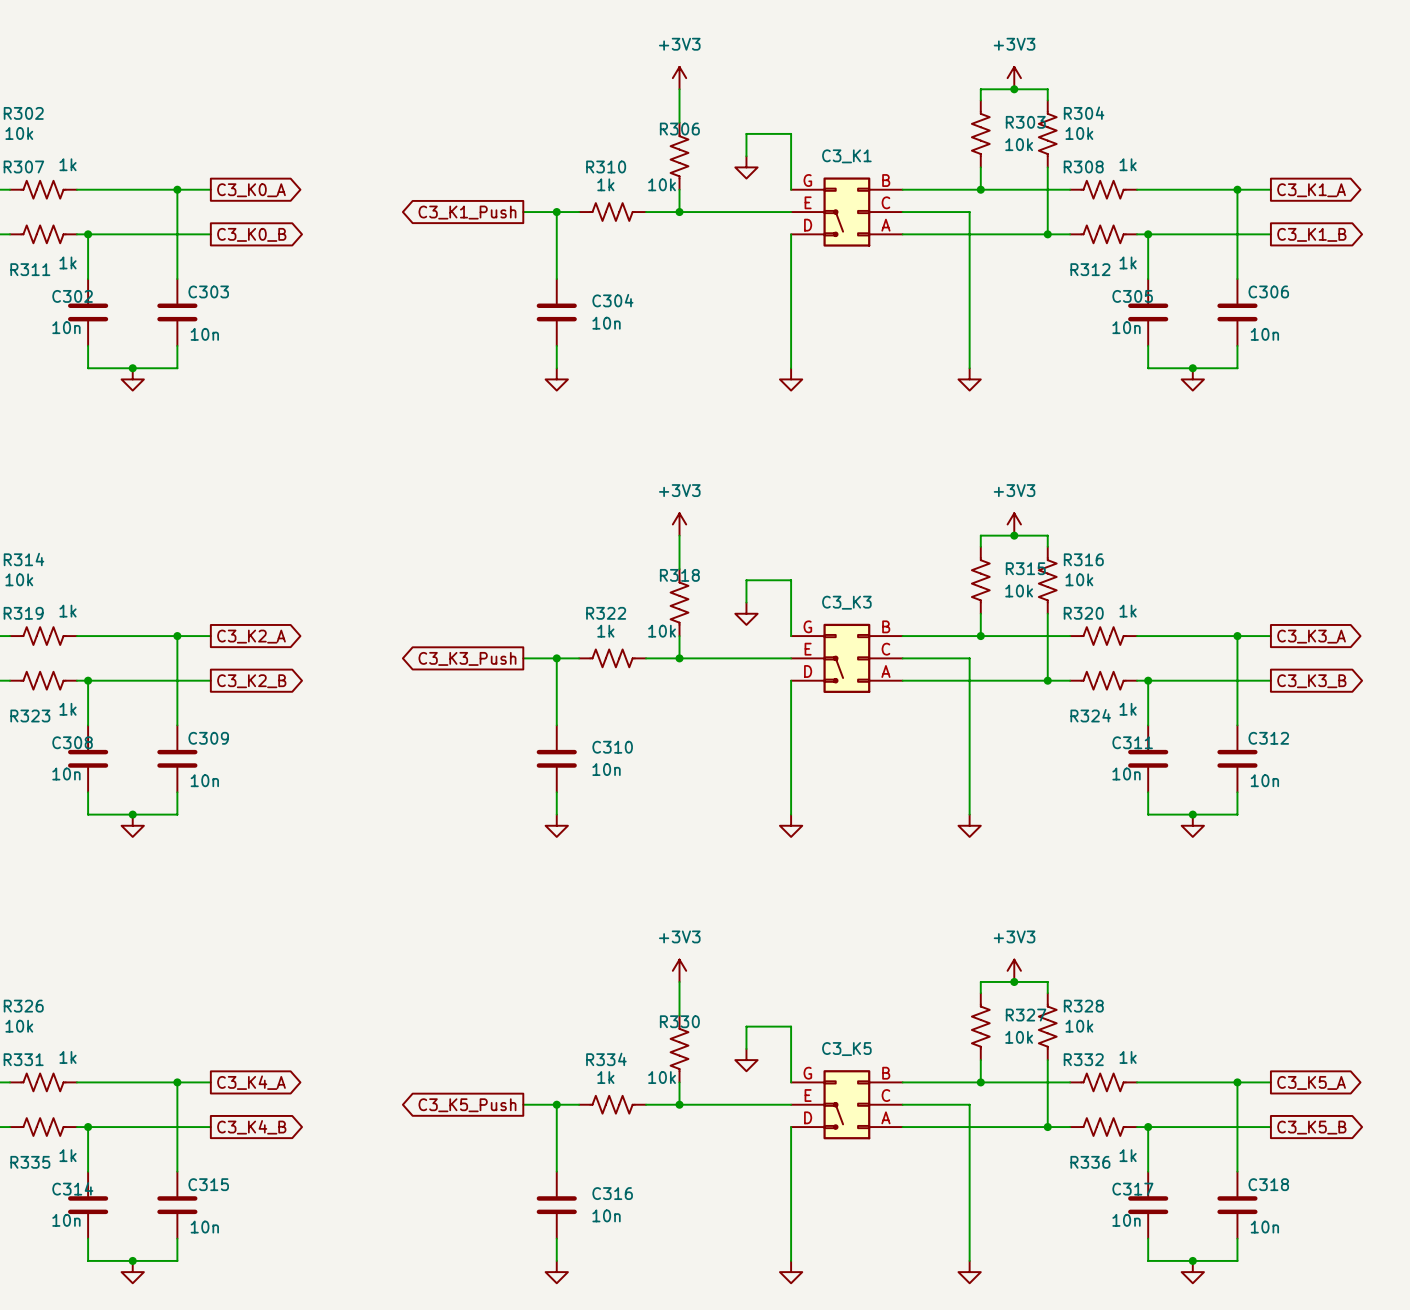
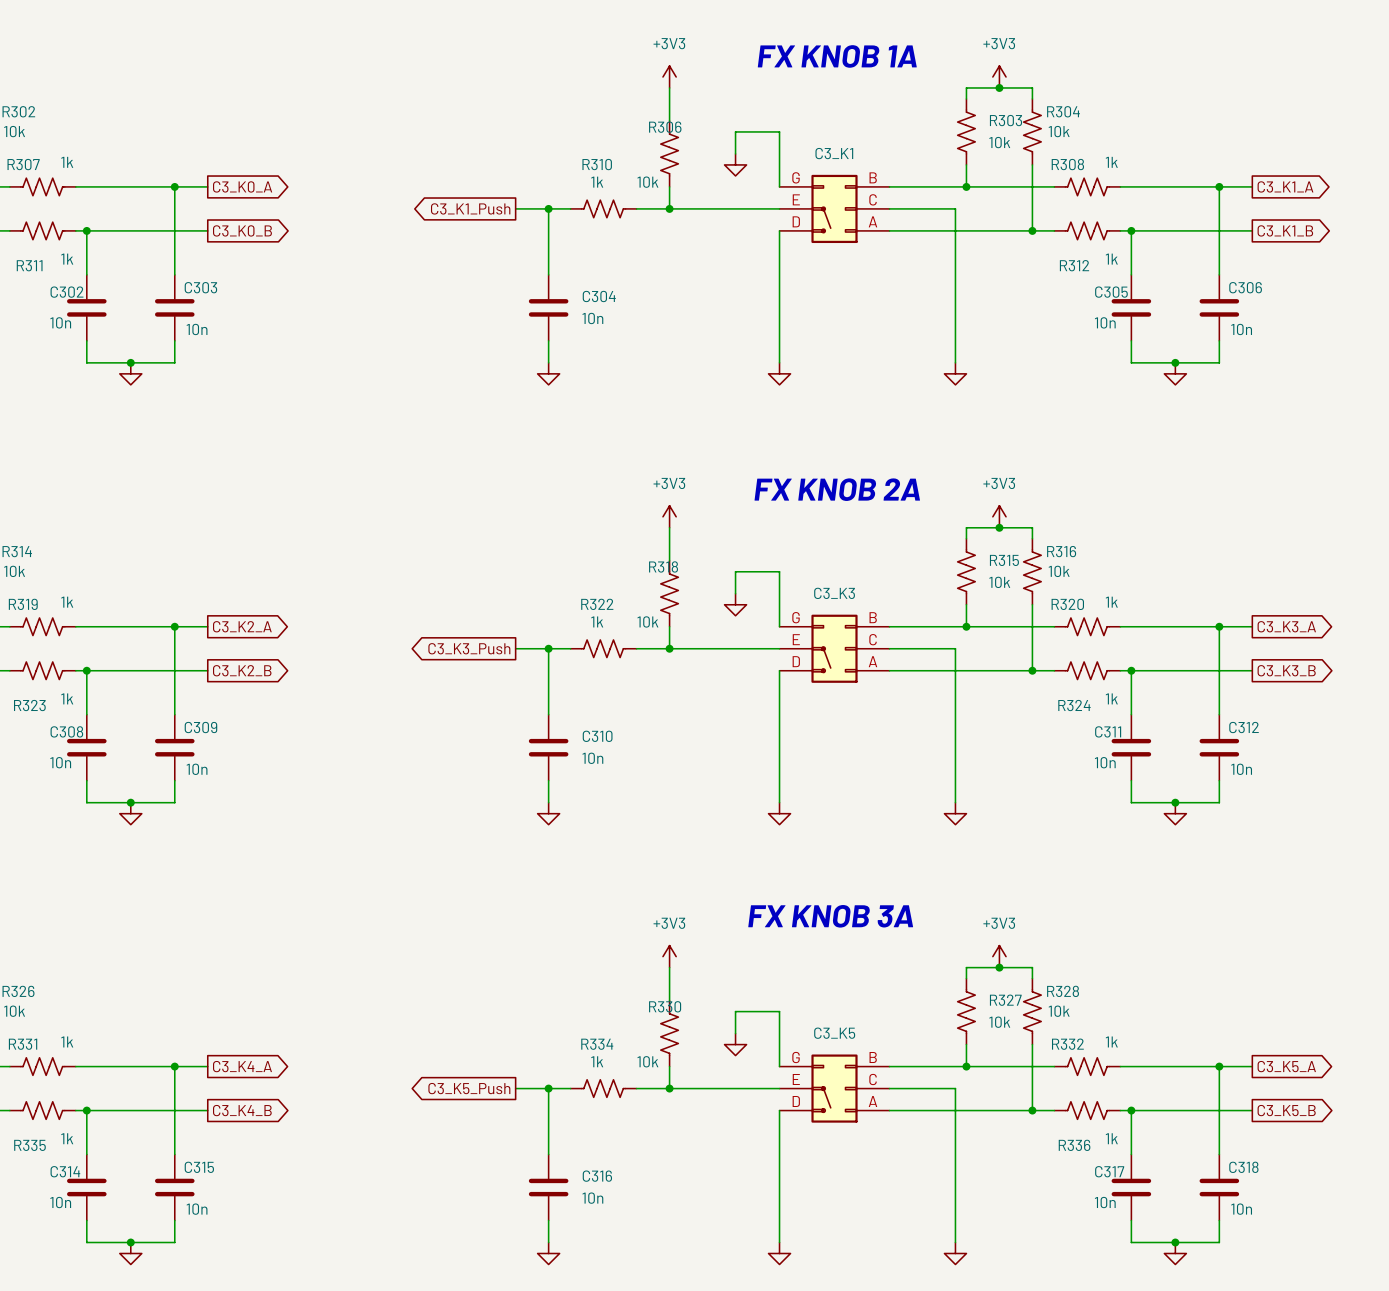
text: none -> FX KNOB 1A (837, 56)
text: none -> FX KNOB 2A (837, 489)
text: none -> FX KNOB 3A (830, 916)

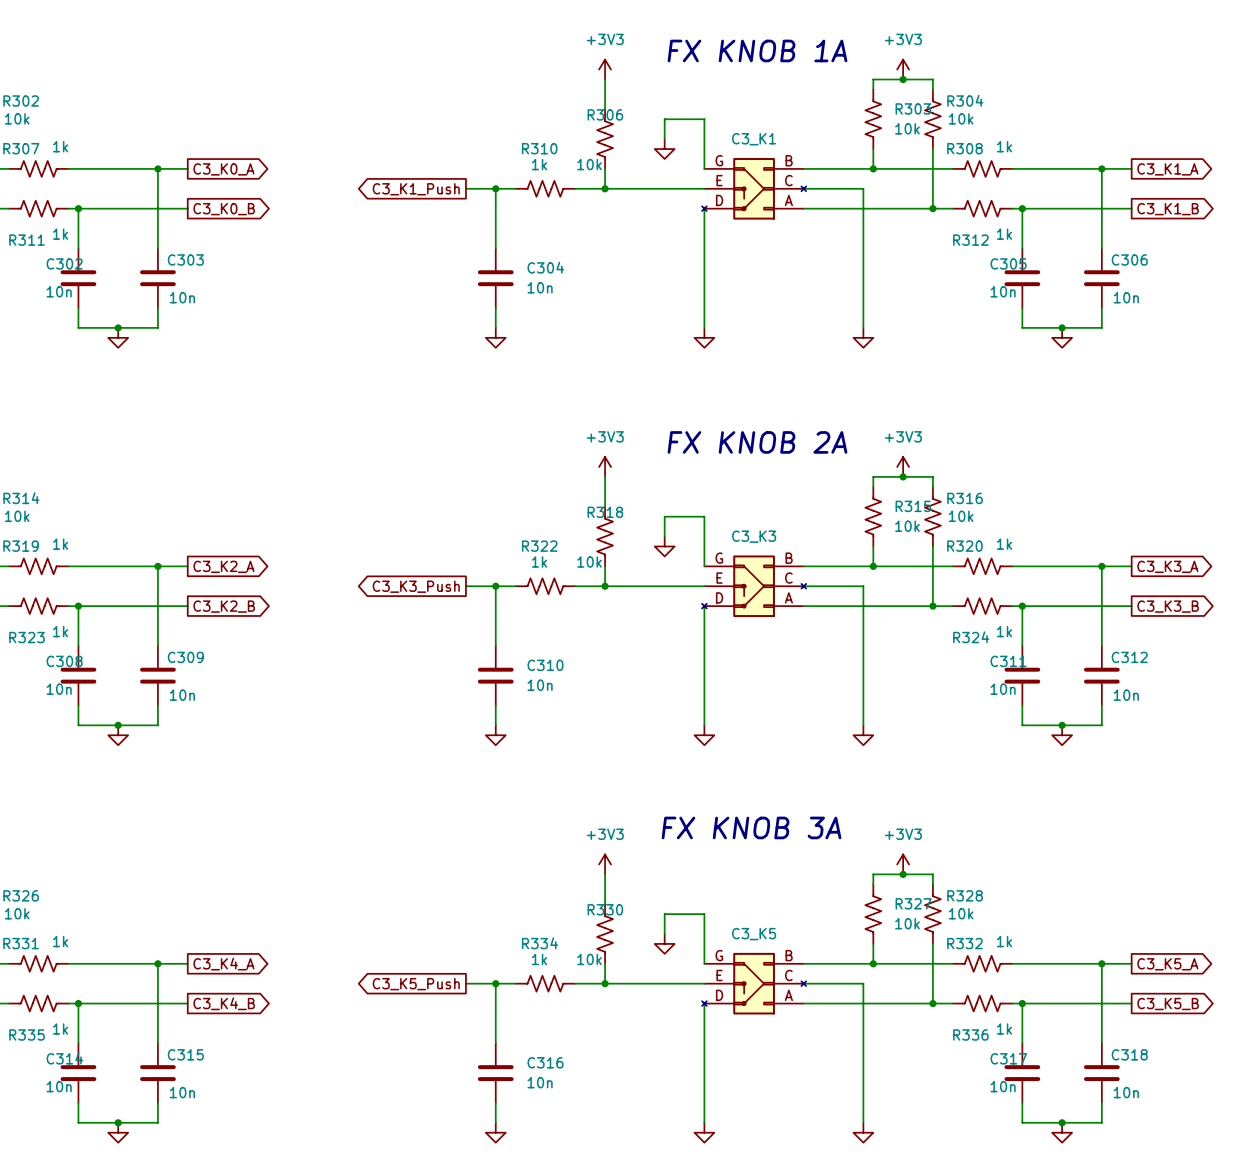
part symbol: [779, 174, 890, 244] -> [702, 158, 807, 220]
part symbol: [779, 614, 890, 683] -> [702, 555, 807, 618]
part symbol: [779, 1054, 890, 1123] -> [702, 952, 807, 1015]

